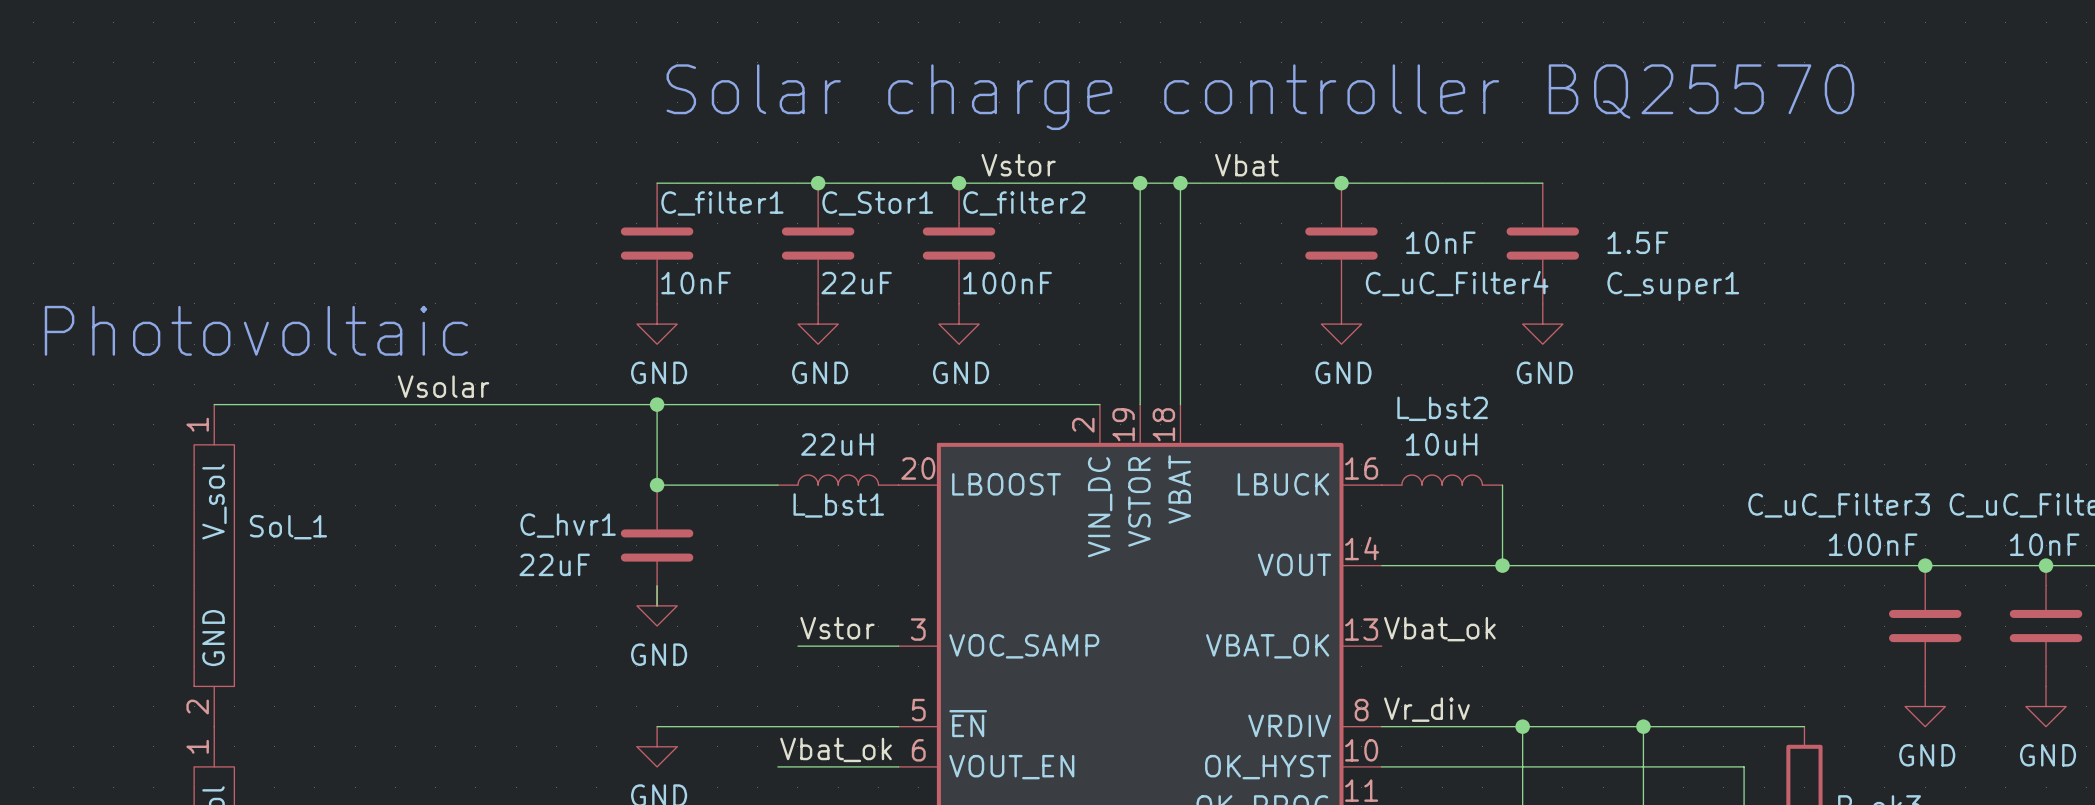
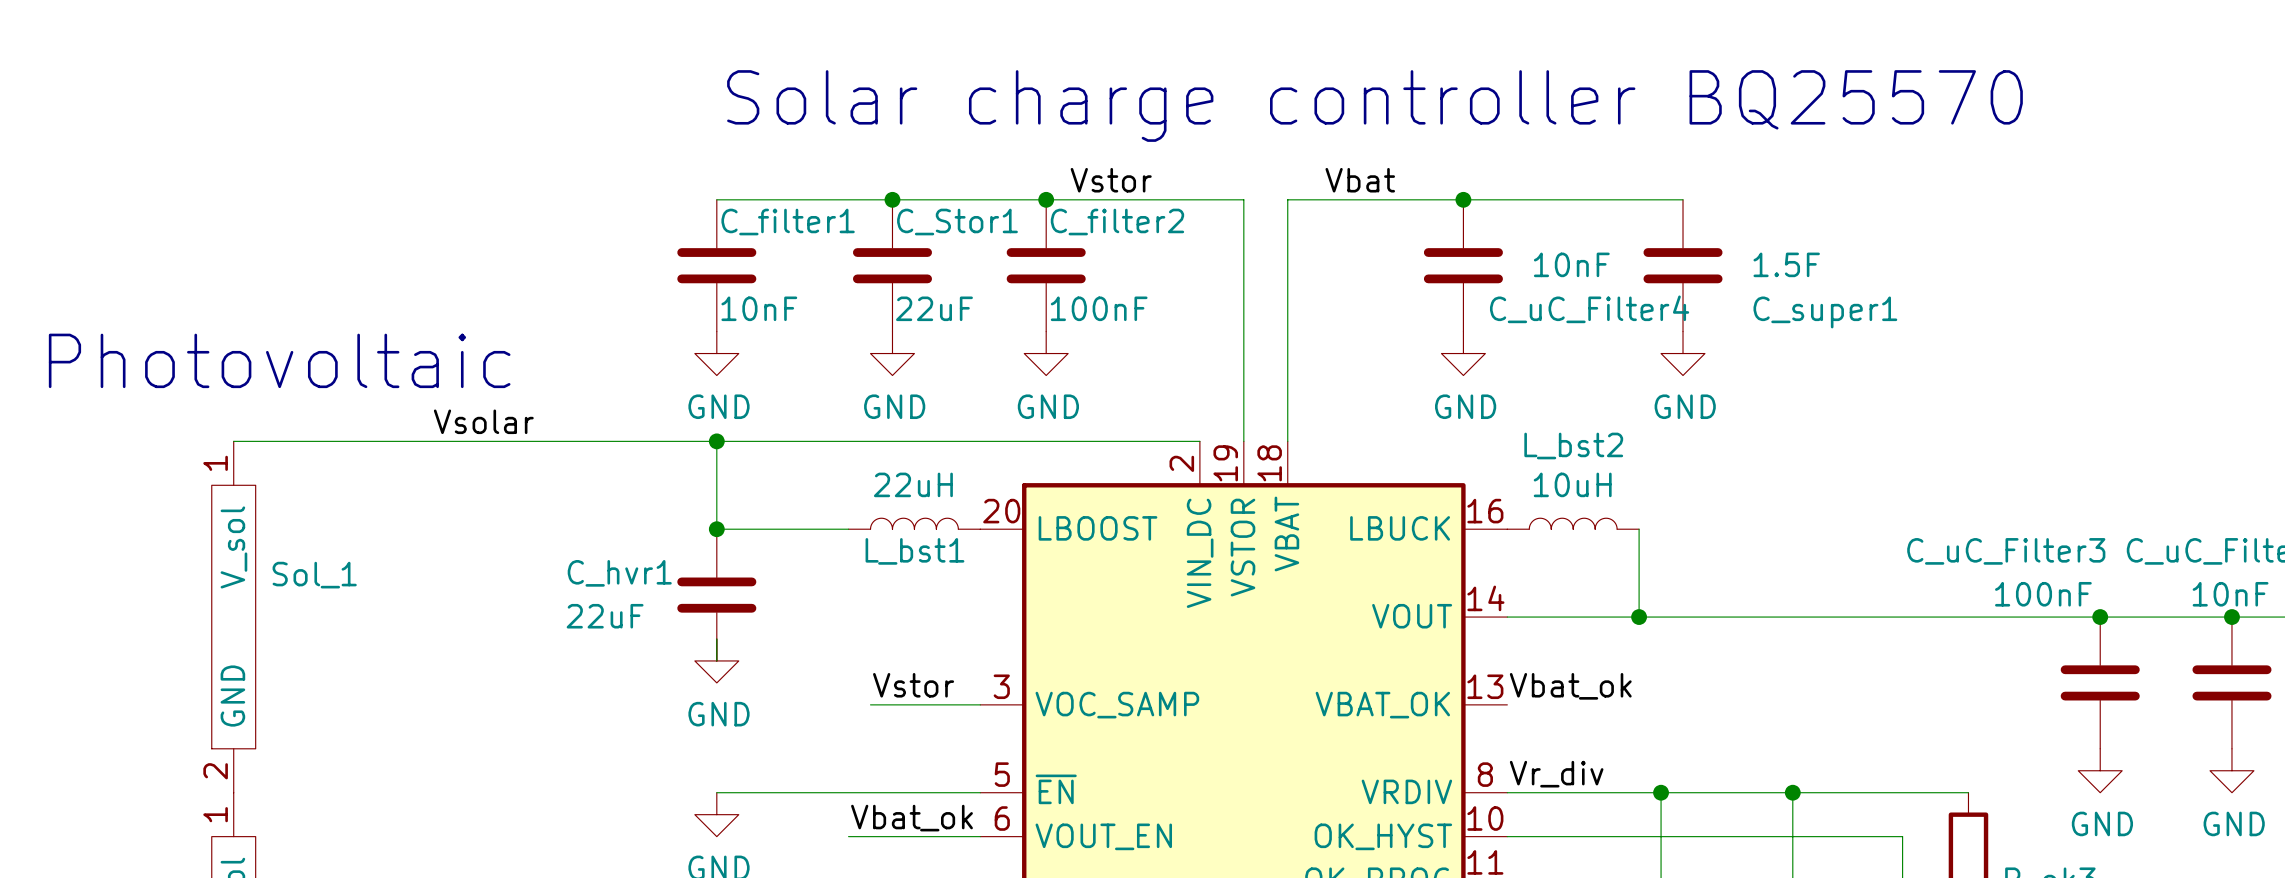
wire: (1140, 183) (1180, 183) -> none
junction: (1140, 183) -> none
junction: (1180, 183) -> none

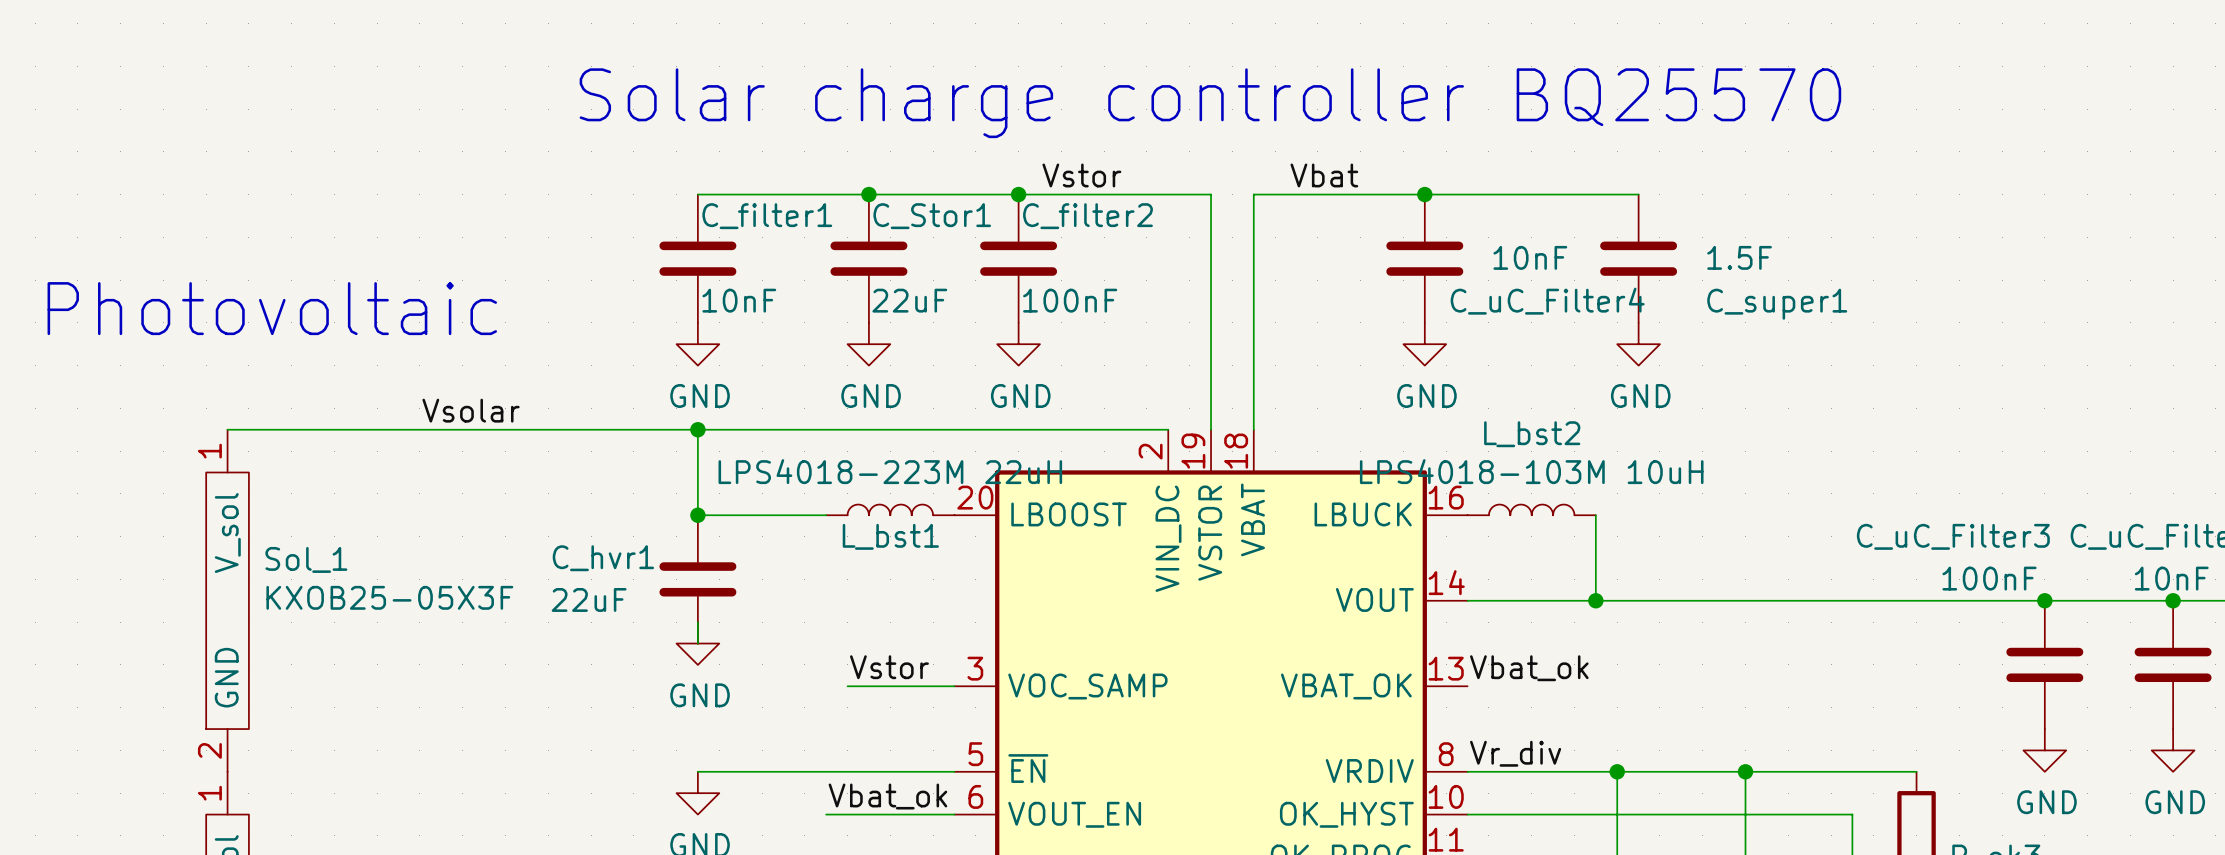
text position: Solar charge controller BQ25570 (1374, 106) -> Solar charge controller BQ25570 (1210, 103)
text position: Photovoltaic (279, 360) -> Photovoltaic (272, 308)
L_bst1 value: 22uH (913, 484) -> LPS4018-223M 22uH (890, 471)
L_bst2 value: 10uH (1572, 484) -> LPS4018-103M 10uH (1531, 471)
Sol_1 value: none -> KXOB25-05X3F (389, 597)

